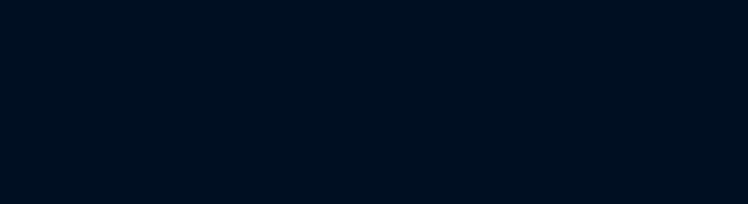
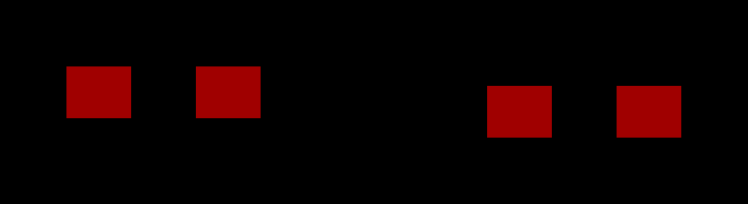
part: none -> (163, 92)
part: none -> (584, 111)

